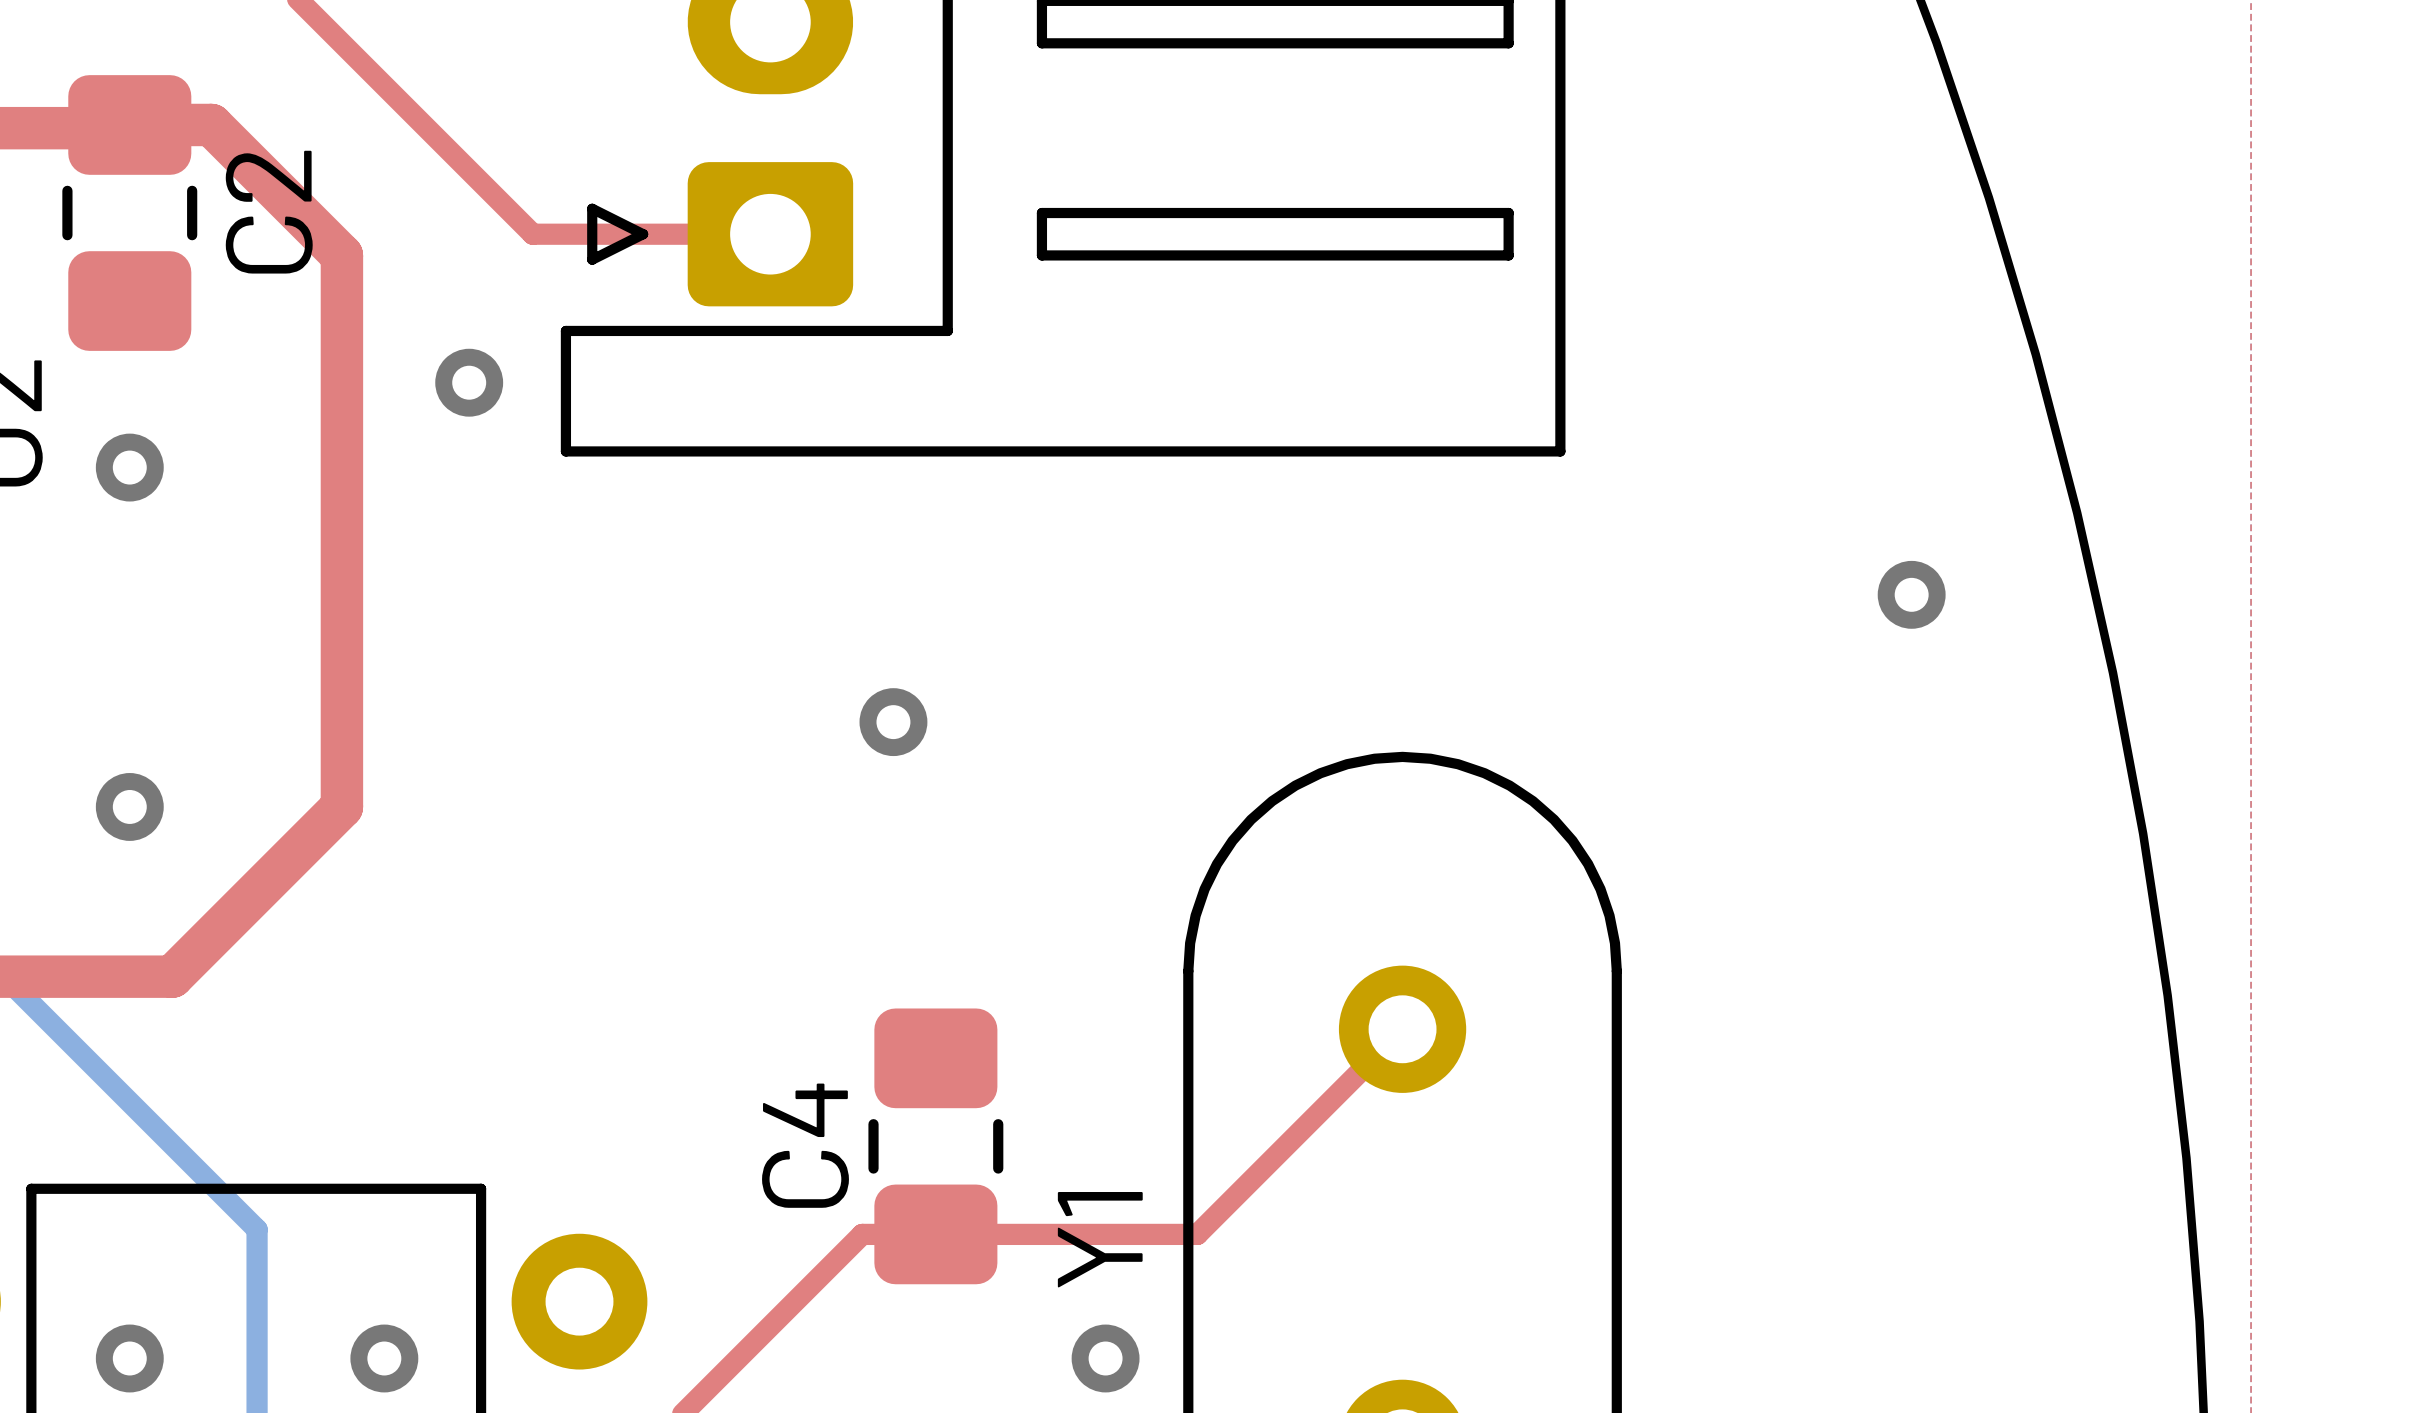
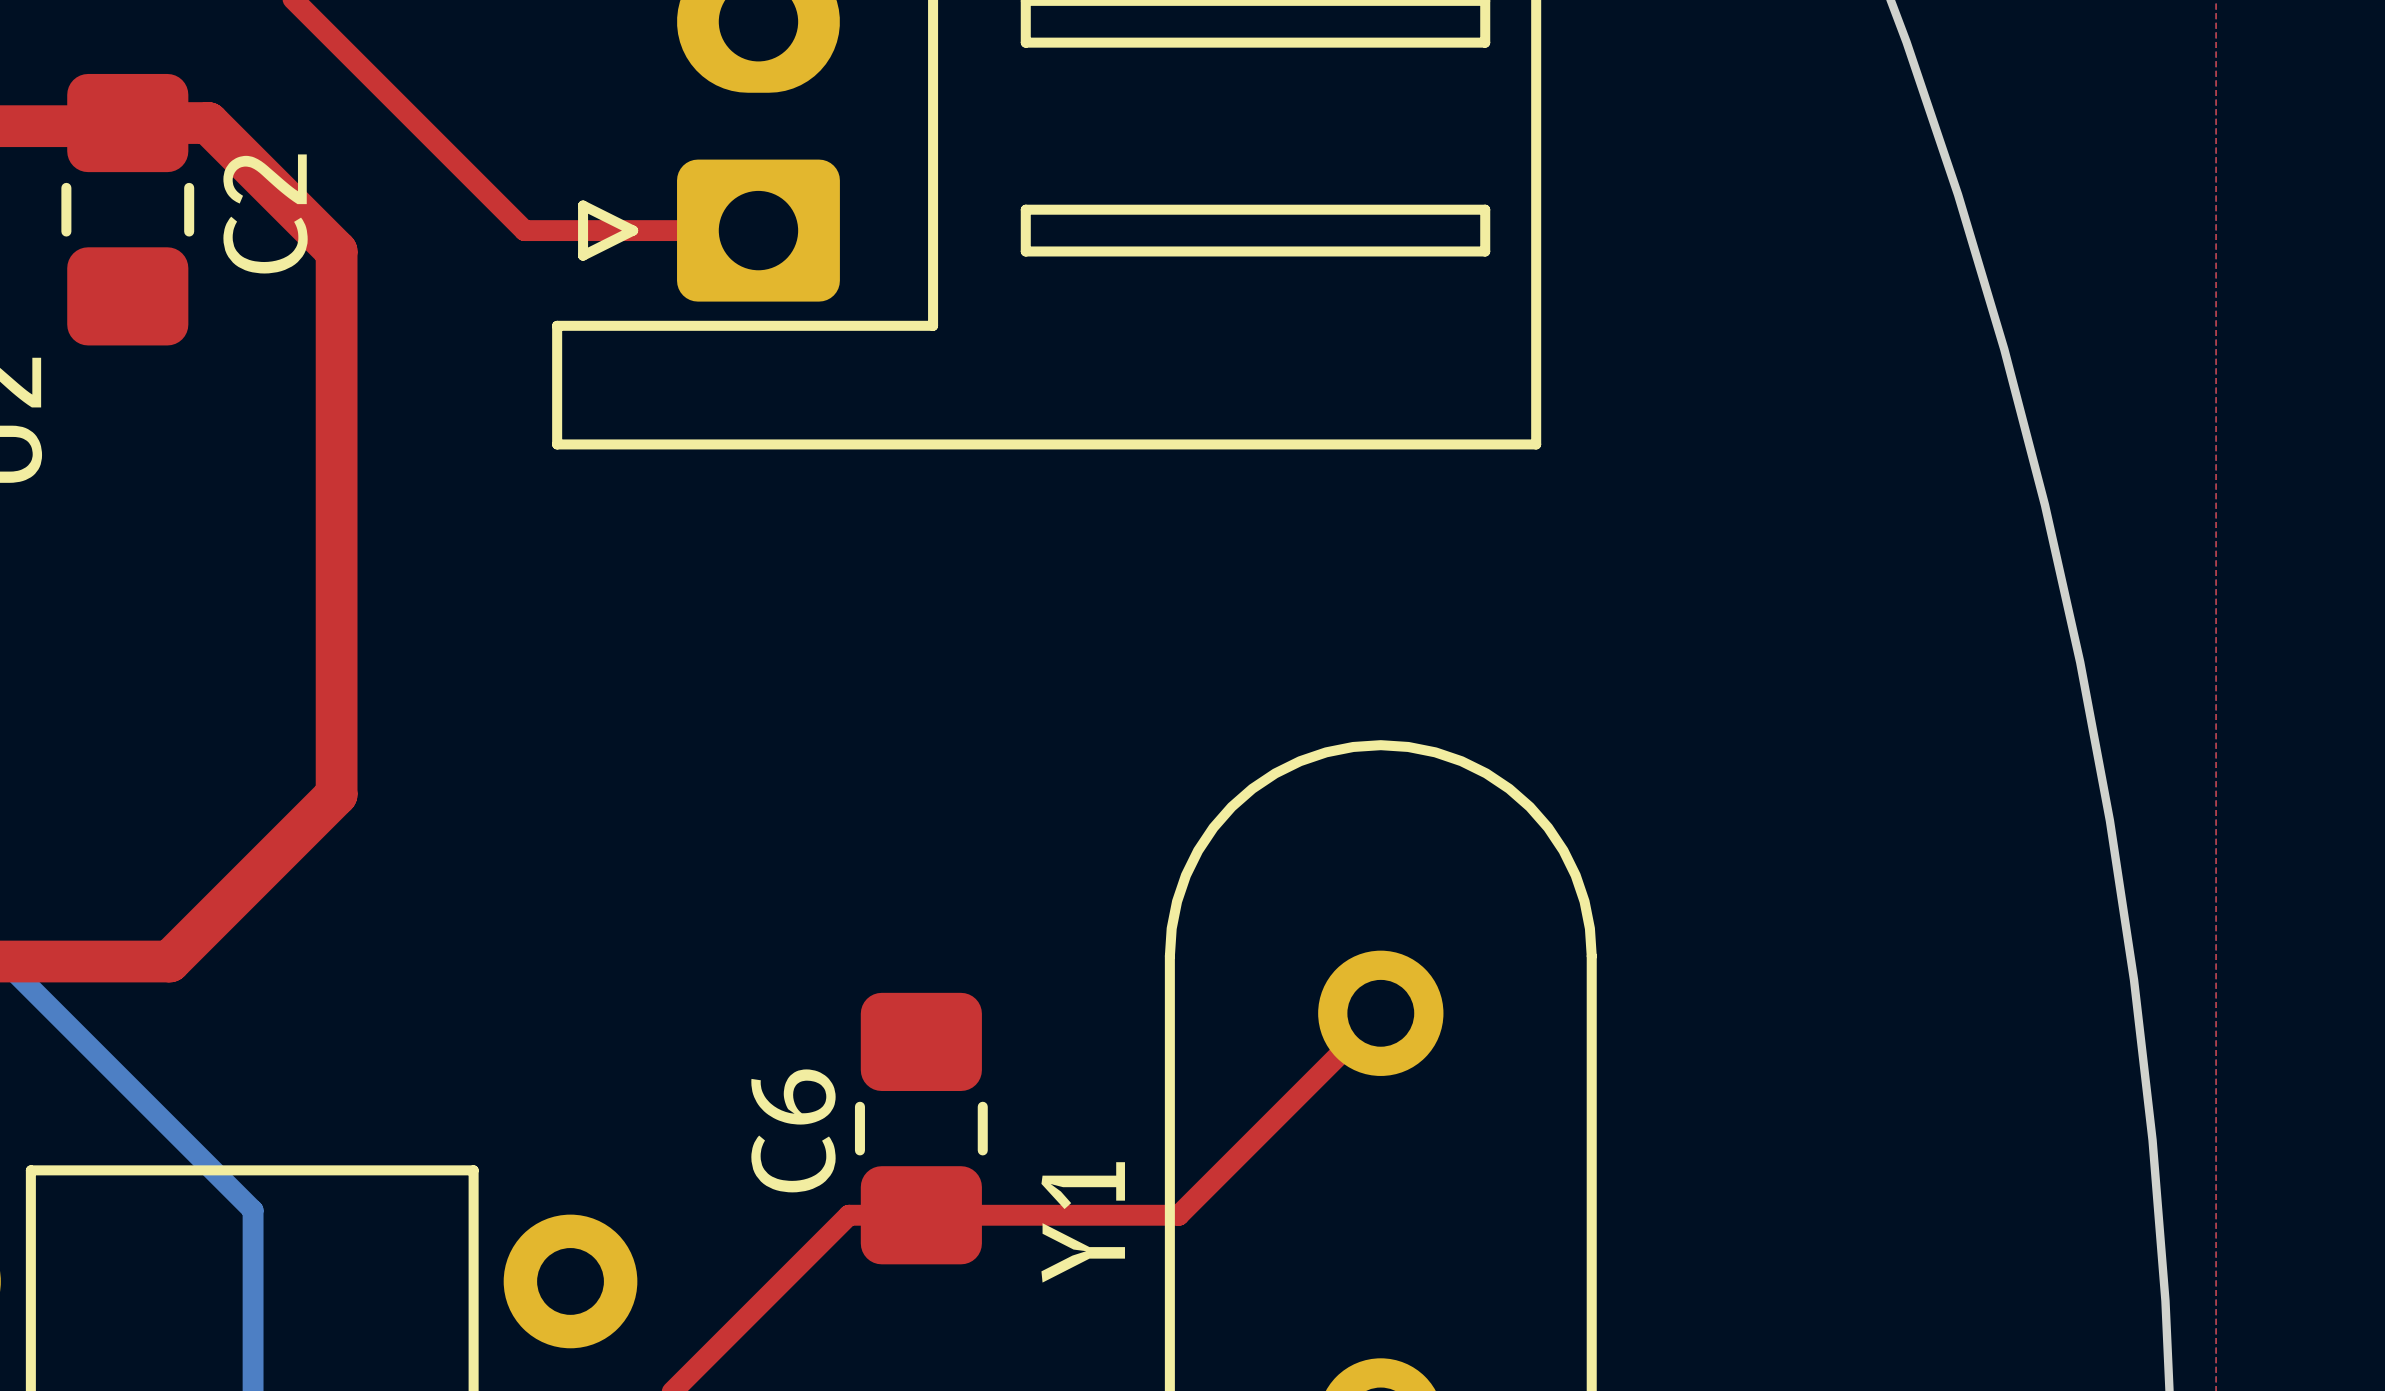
via: (469, 382) -> none
via: (129, 467) -> none
via: (1911, 594) -> none
via: (893, 722) -> none
via: (129, 806) -> none
C4 name: C4 (805, 1145) -> C6 (793, 1130)
via: (129, 1358) -> none
via: (384, 1358) -> none
via: (1105, 1358) -> none

